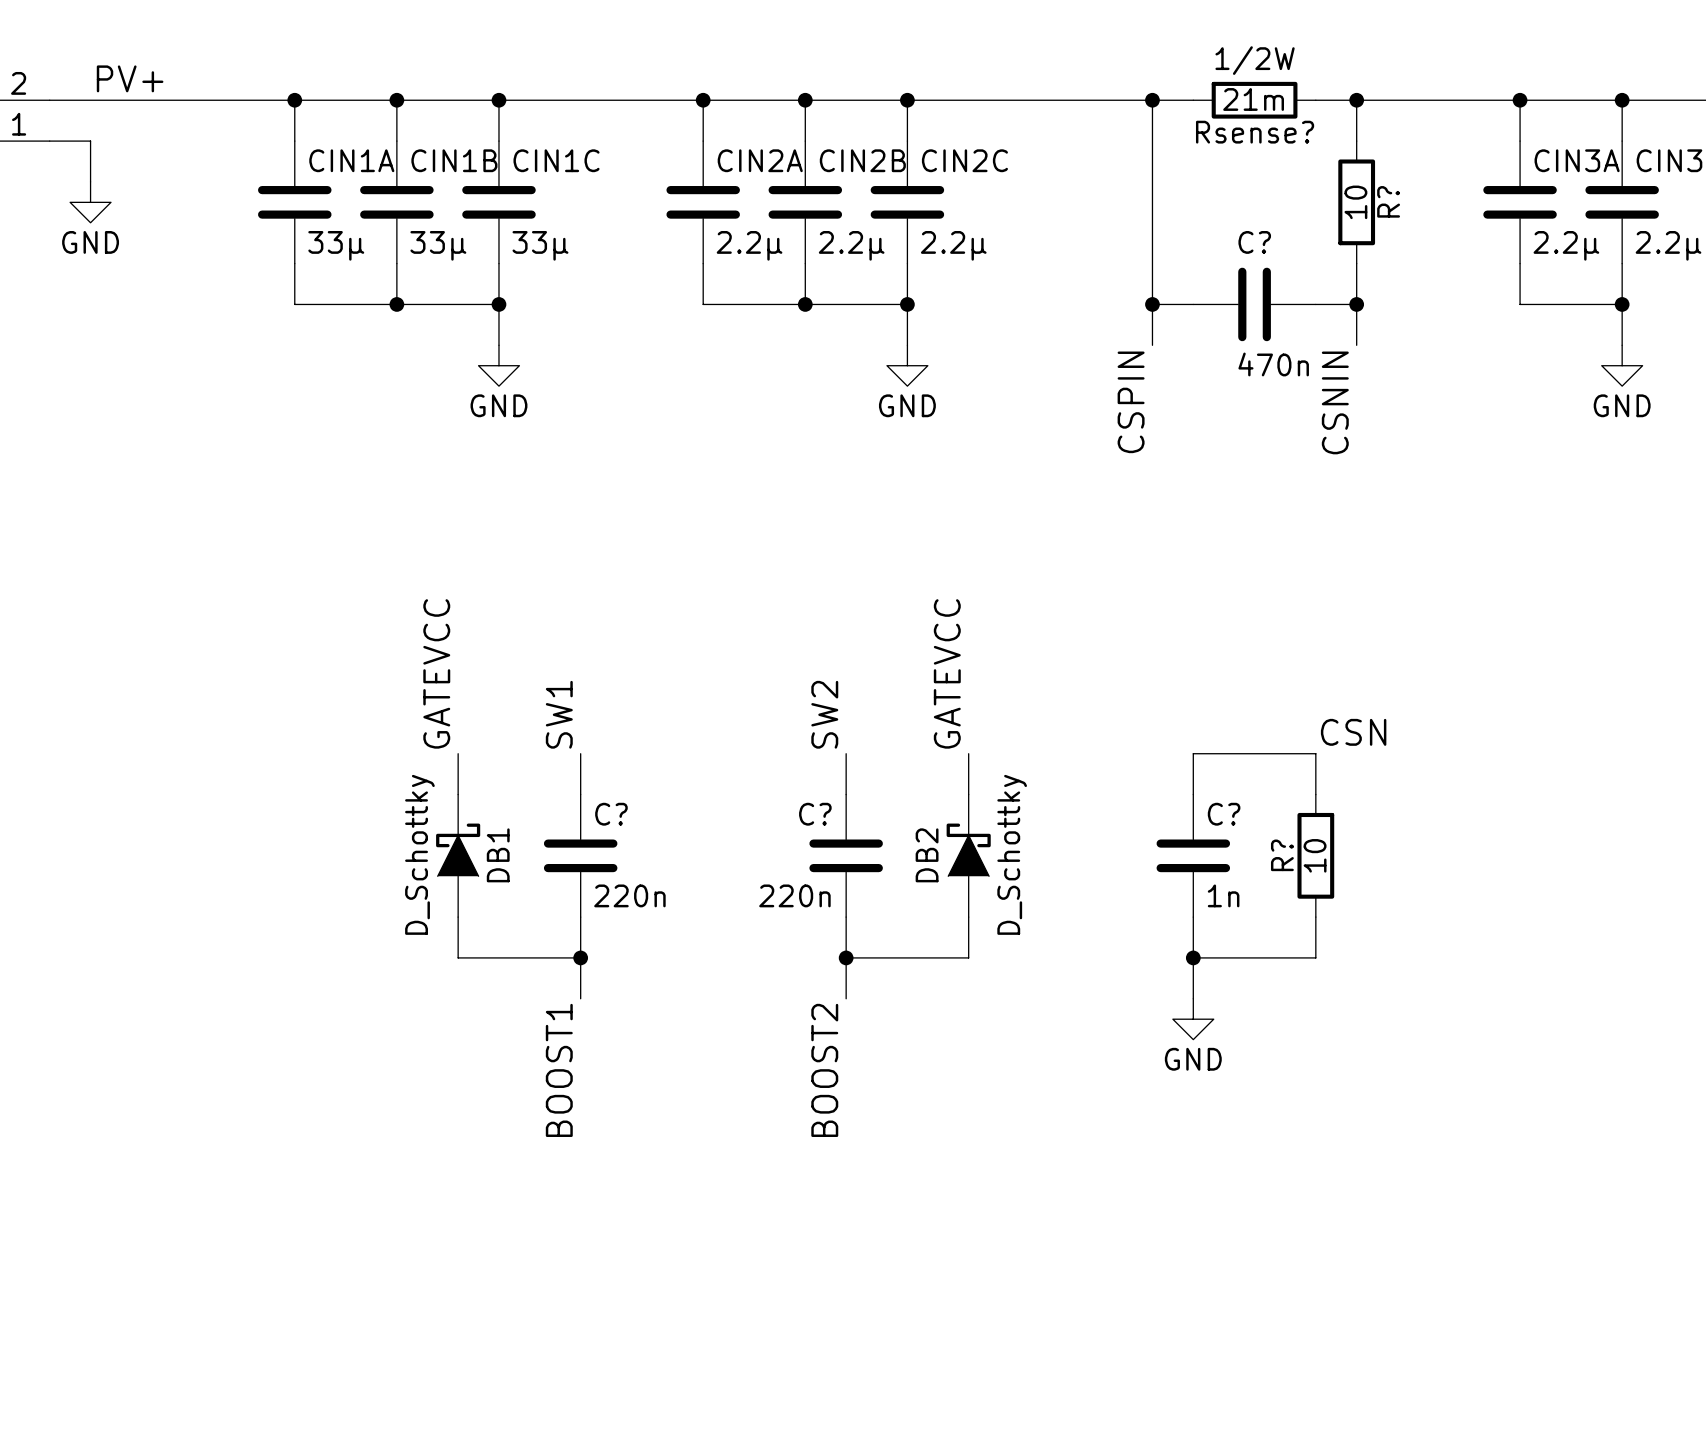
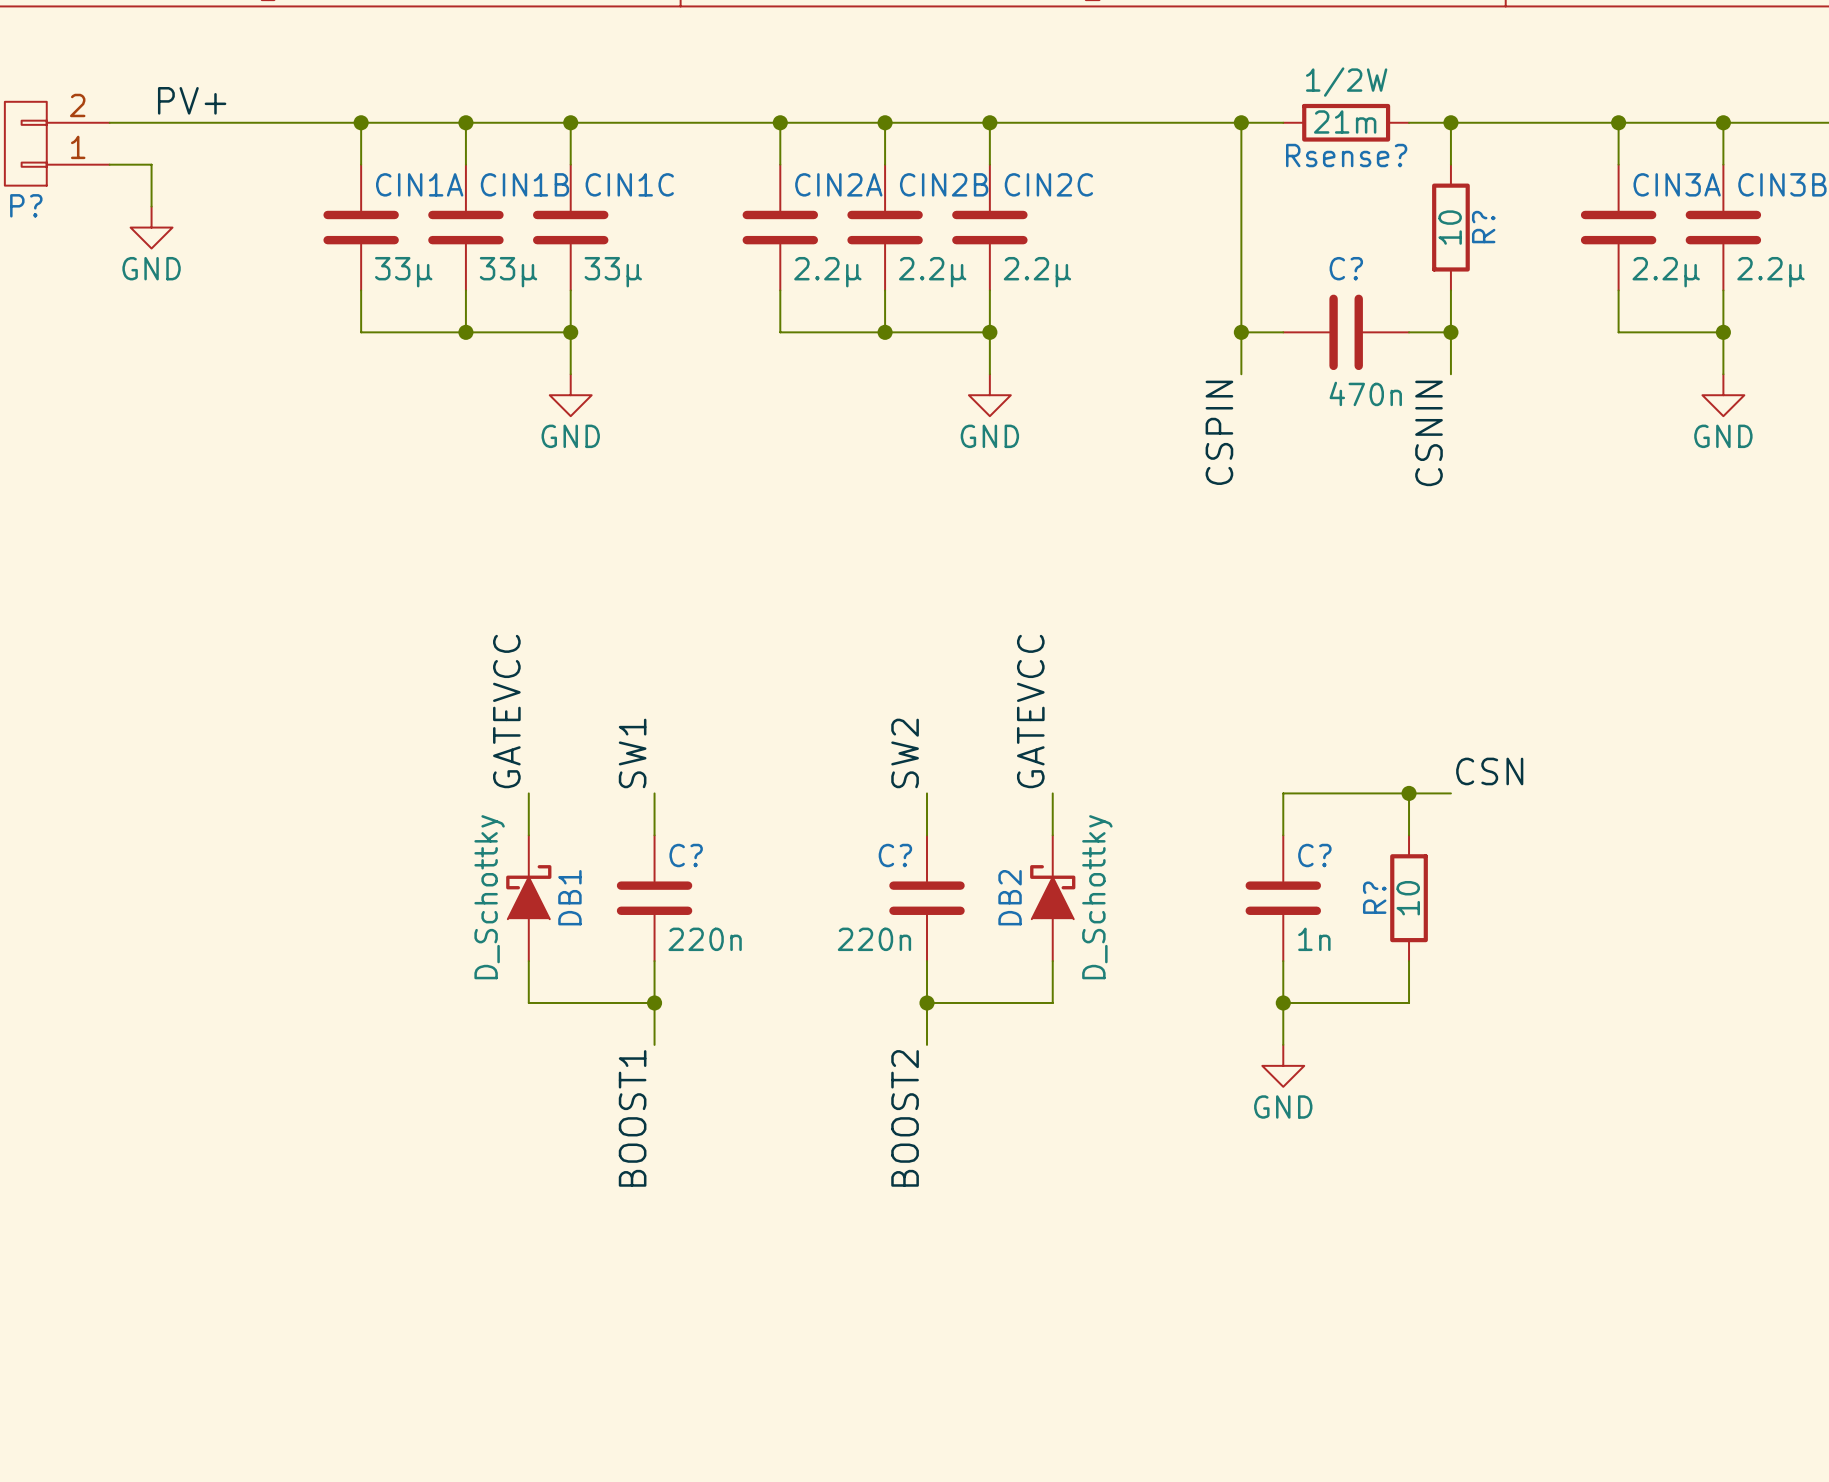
label position: CSN (1353, 732) -> CSN (1489, 771)
wire: none -> (1409, 793) (1450, 793)
junction: none -> (1409, 793)

